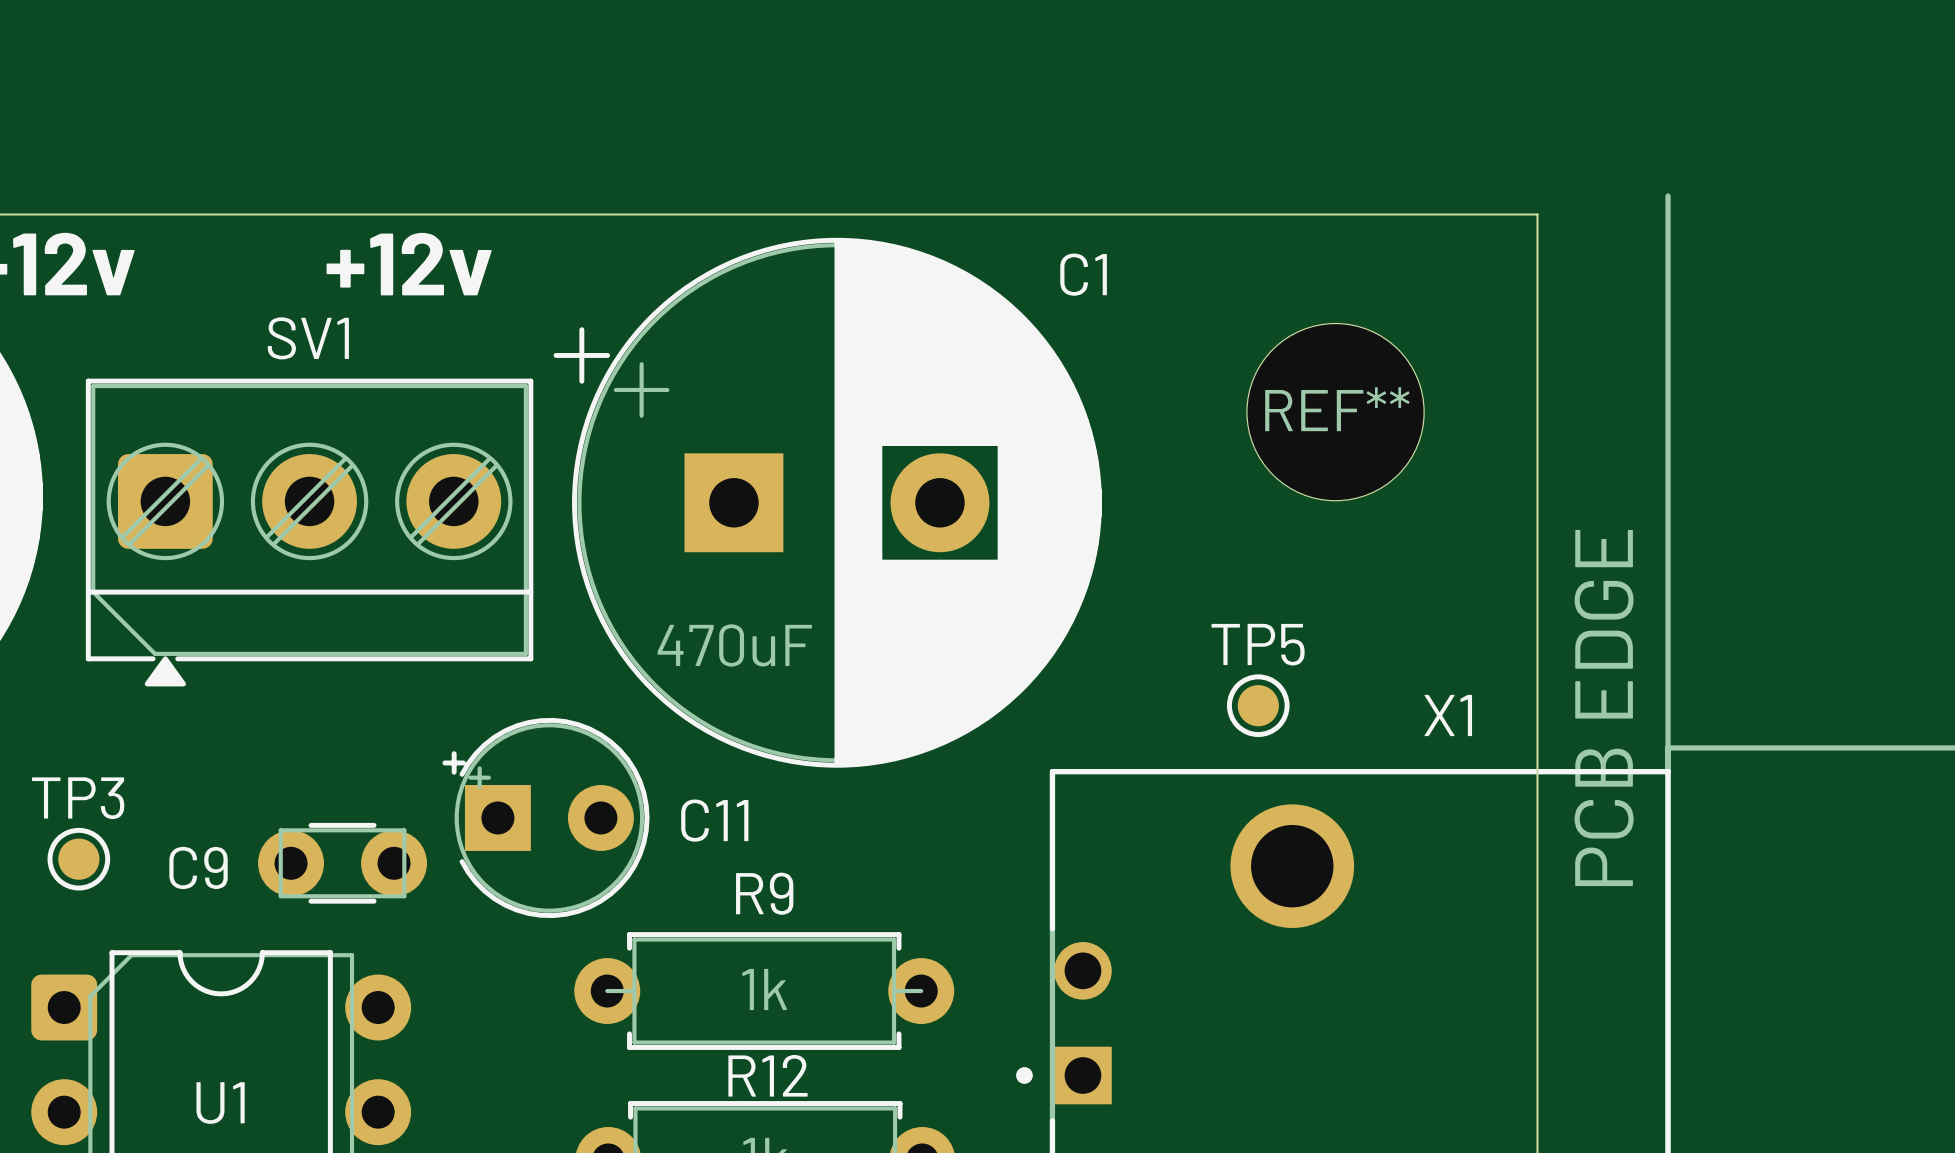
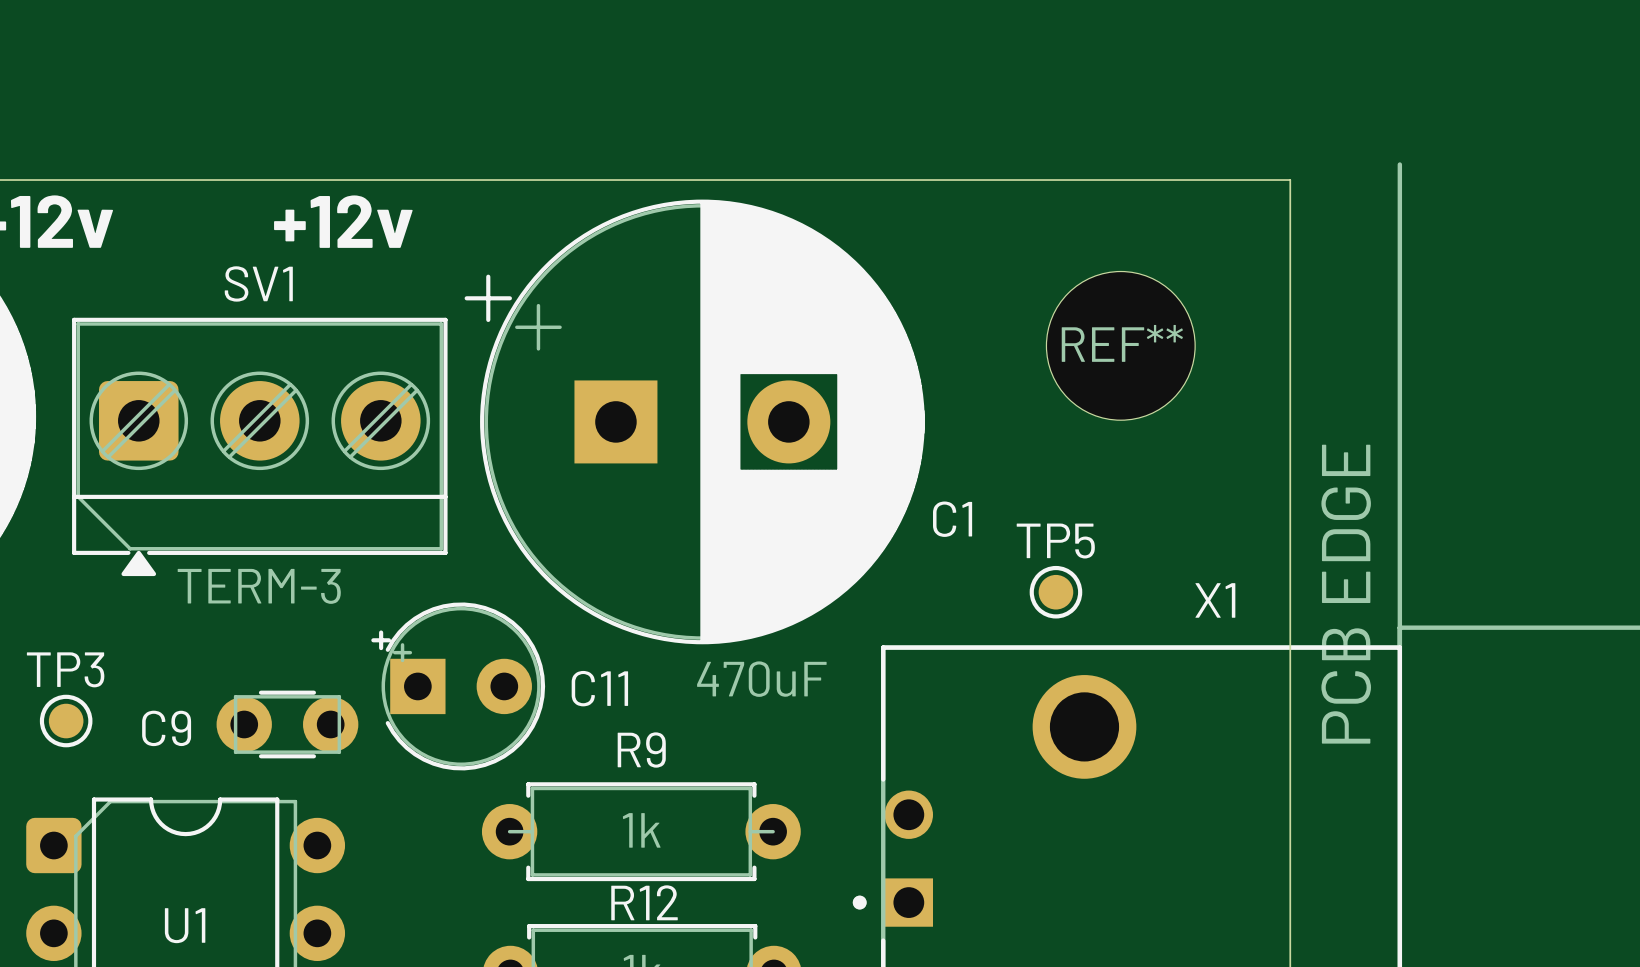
C1 name position: C1 (1083, 274) -> C1 (952, 519)
C1 value position: 470uF (734, 645) -> 470uF (761, 679)
SV1 value: none -> TERM-3 (259, 586)

